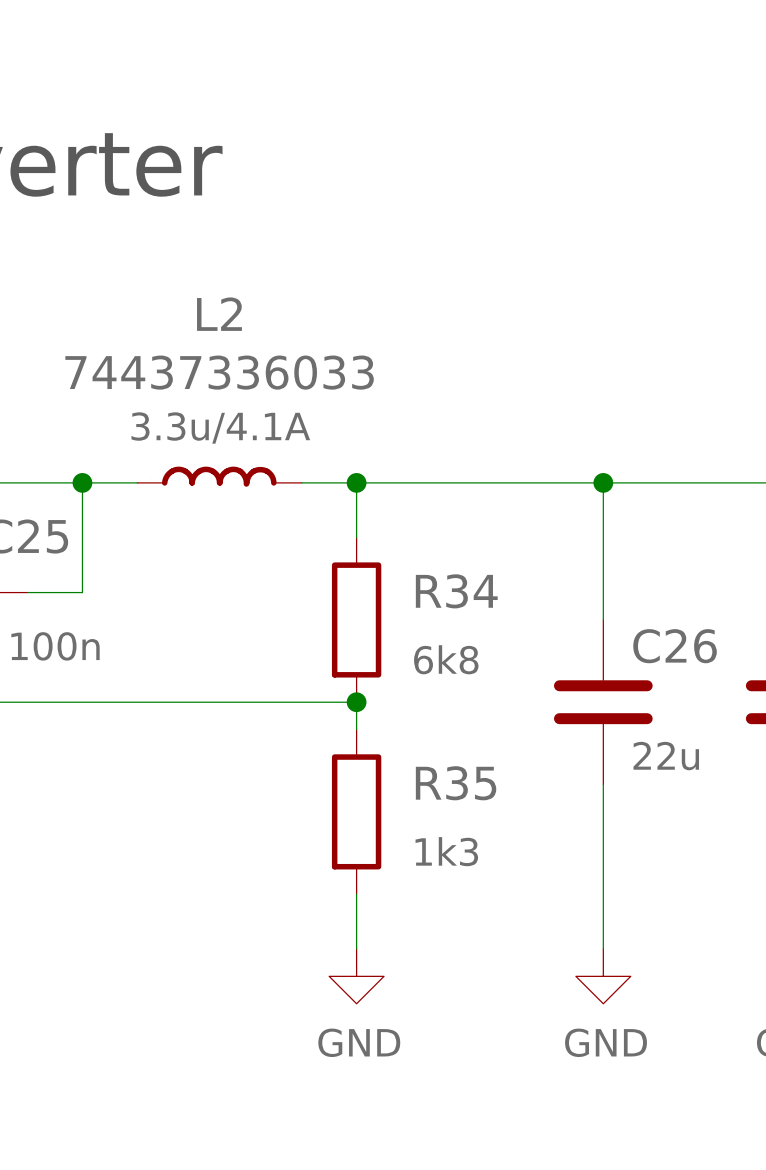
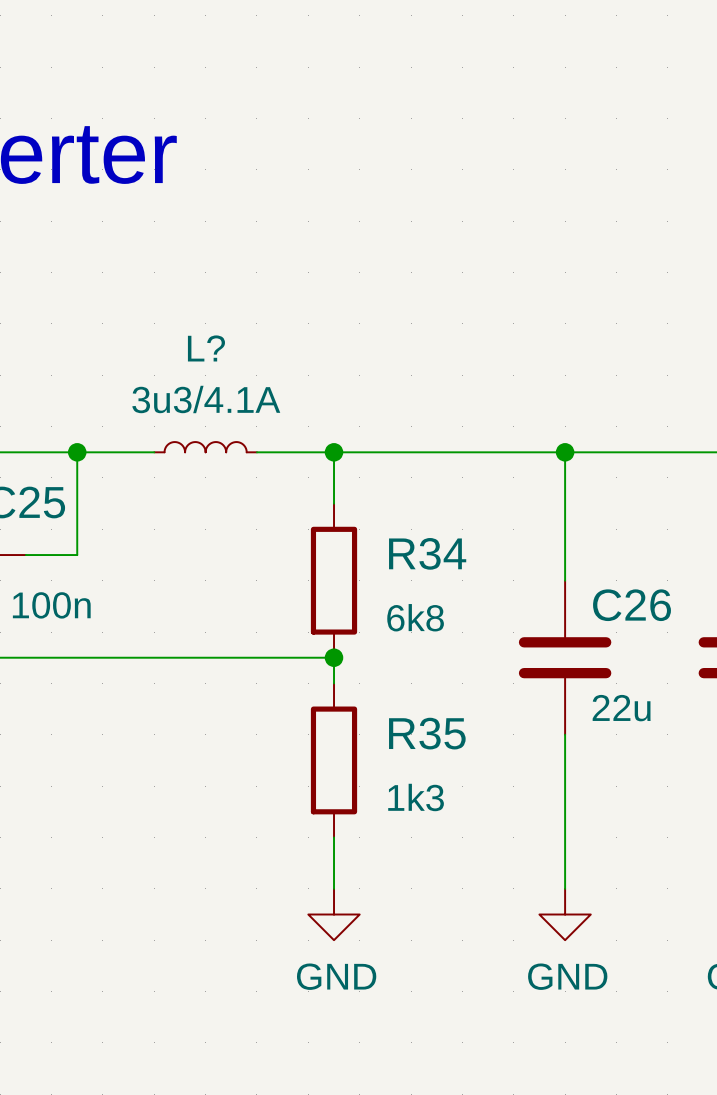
L2: 74437336033 (219, 476) -> none
L?: none -> (205, 447)

